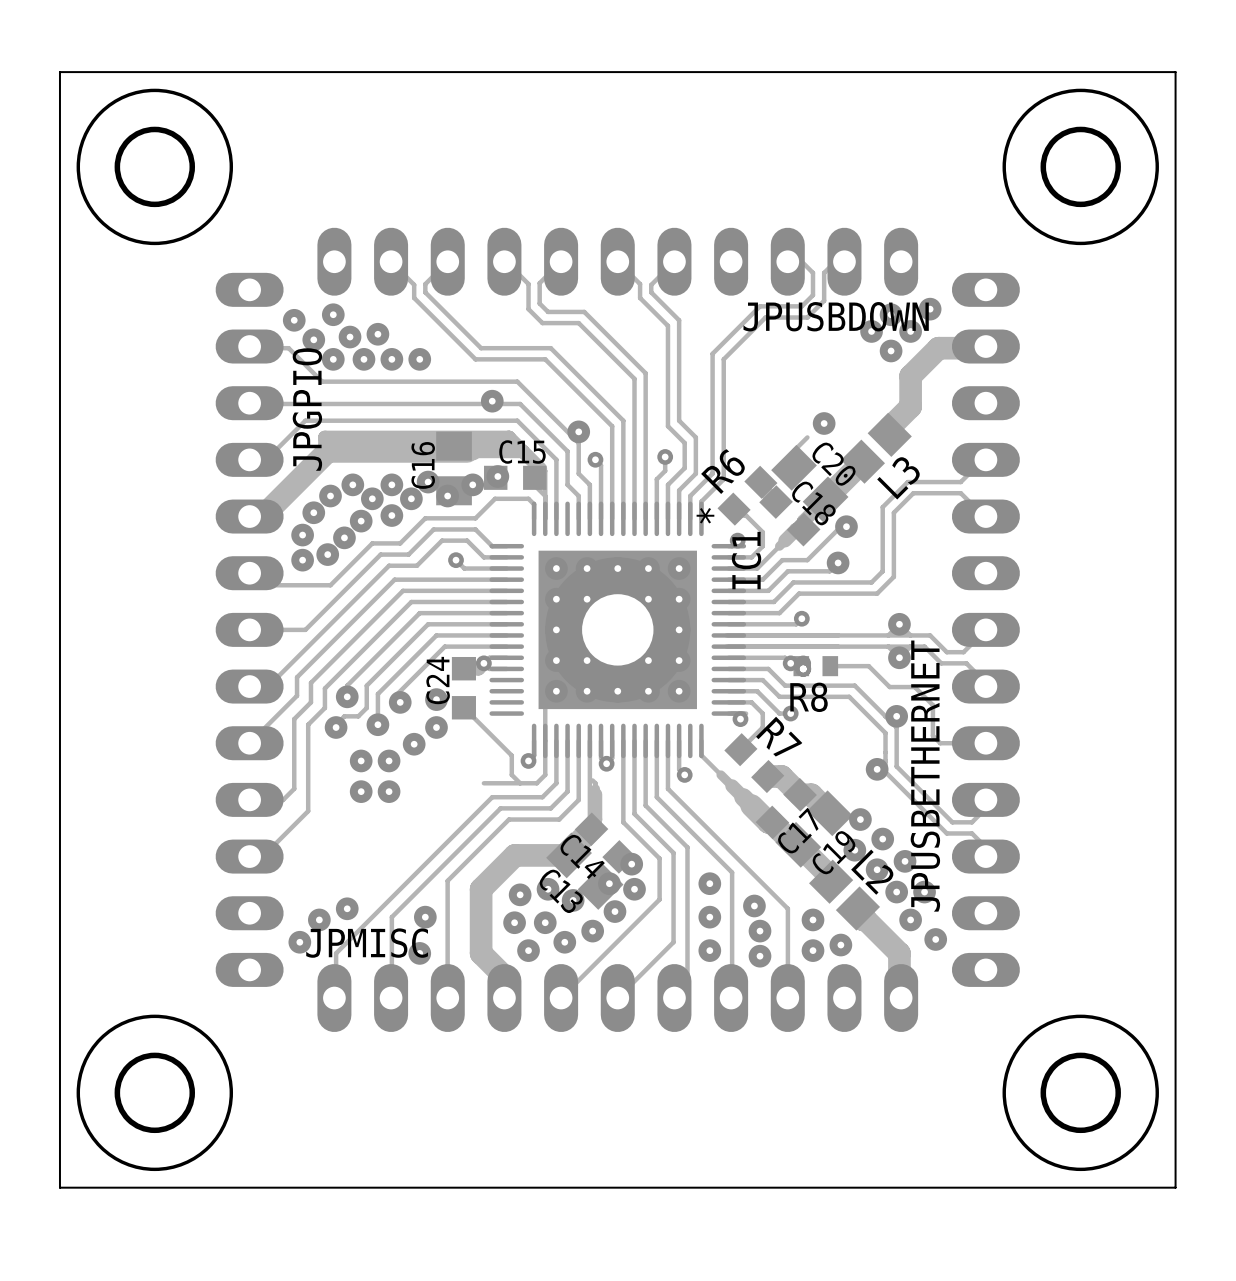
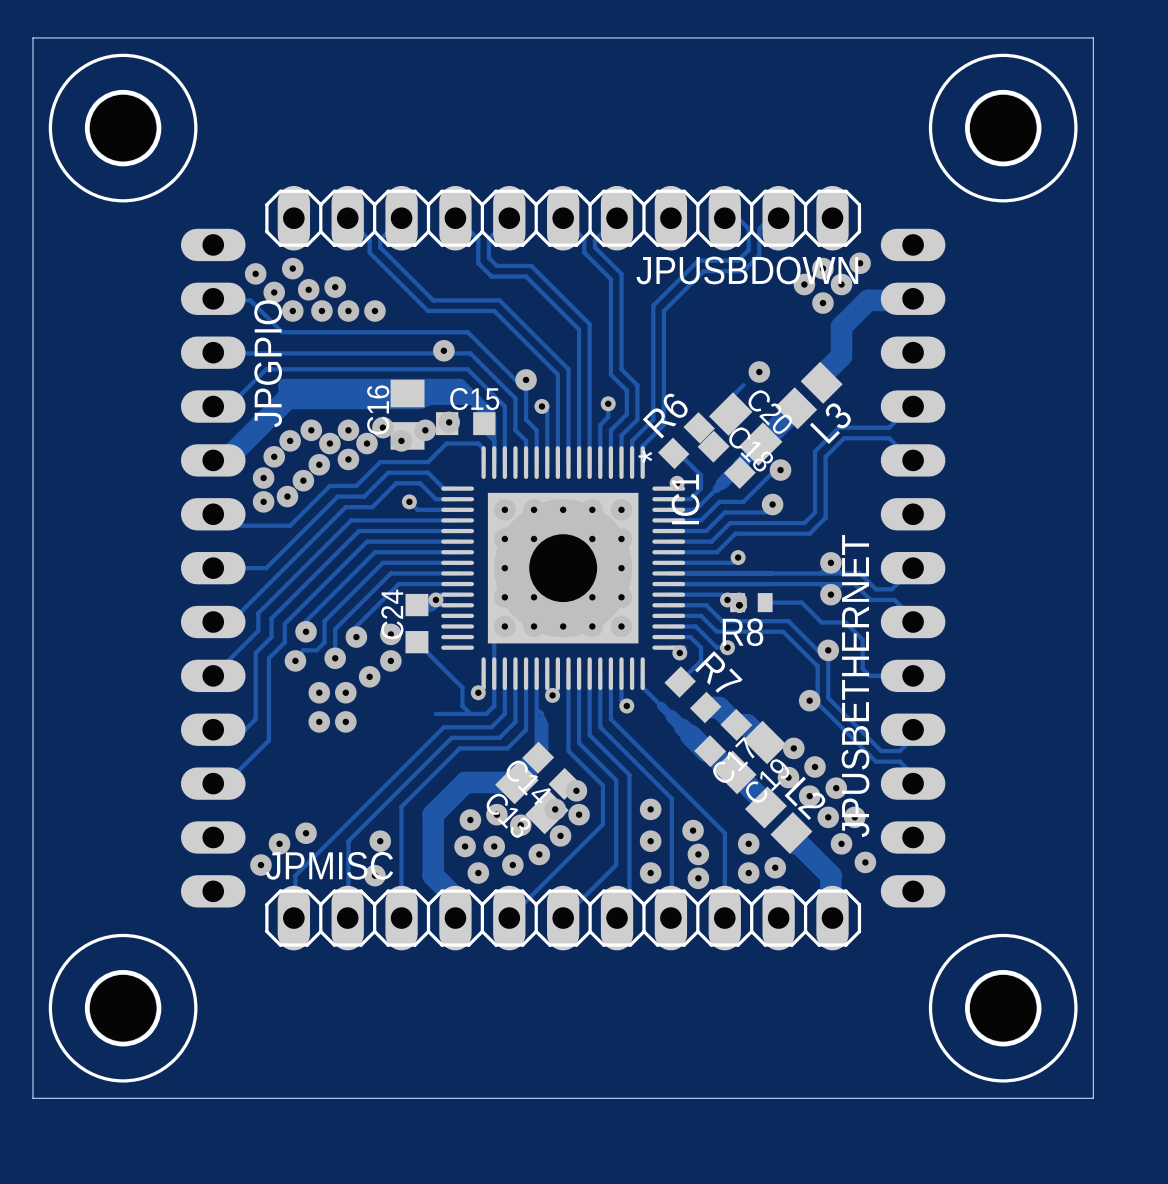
JPUSBDOWN side: bottom (617, 261) -> top (563, 218)
JPMISC side: bottom (617, 998) -> top (563, 918)

